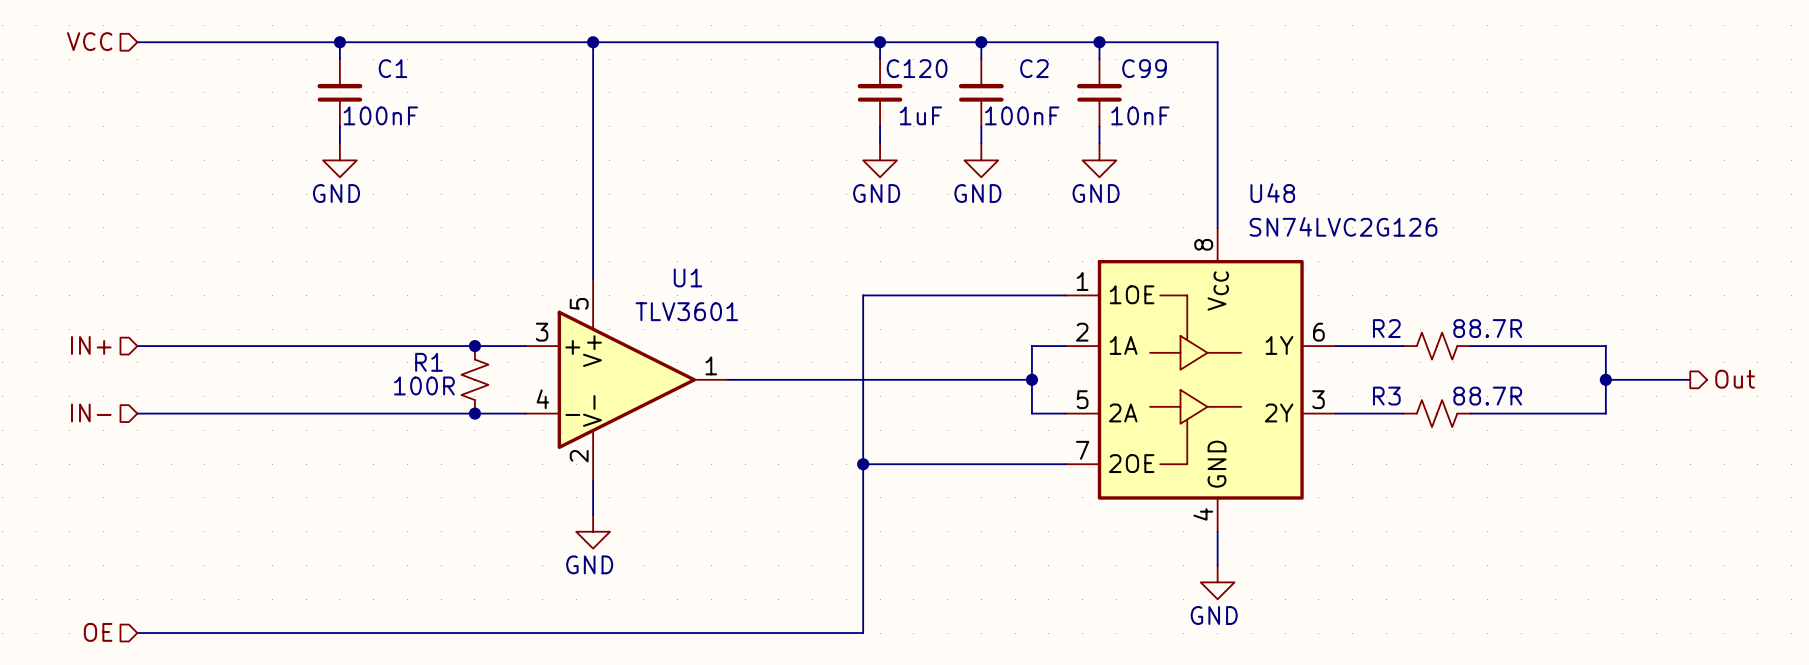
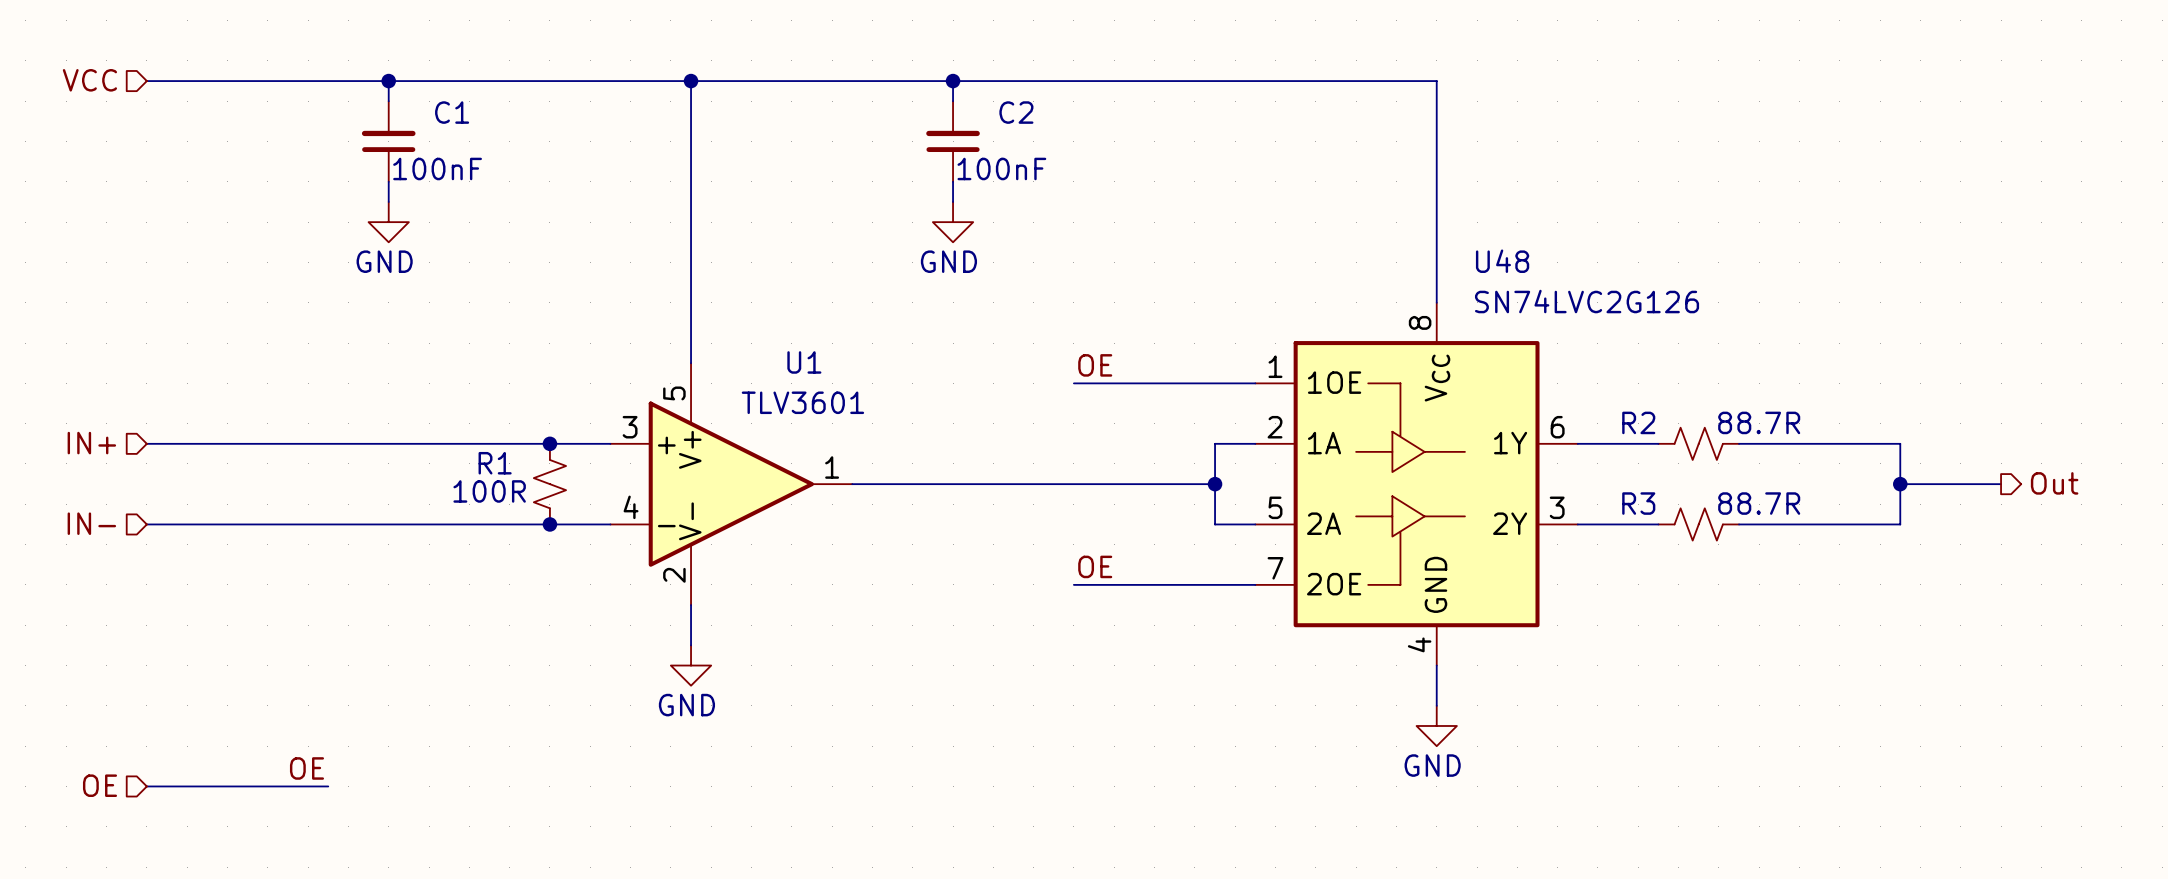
wire: (880, 42) (880, 59) -> (953, 81) (953, 101)
junction position: (880, 42) -> (953, 81)
wire: (981, 42) (981, 59) -> none
junction: (981, 42) -> none
wire: (1099, 42) (1099, 59) -> none
junction: (1099, 42) -> none
C120: 1uF (880, 92) -> none
C2 position: (981, 92) -> (953, 141)
C99: 10nF (1099, 92) -> none
wire: (880, 126) (880, 143) -> (953, 181) (953, 201)
wire: (981, 126) (981, 143) -> none
wire: (1099, 126) (1099, 143) -> none
power symbol position: GND (880, 160) -> GND (953, 222)
power symbol: GND (981, 160) -> none
power symbol: GND (1099, 160) -> none
label: none -> OE (1095, 365)
wire: (913, 295) (863, 295) (863, 633) (289, 633) -> none
label: none -> OE (1095, 566)
wire: (863, 464) (913, 464) -> none
junction: (863, 464) -> none
label: none -> OE (306, 768)

